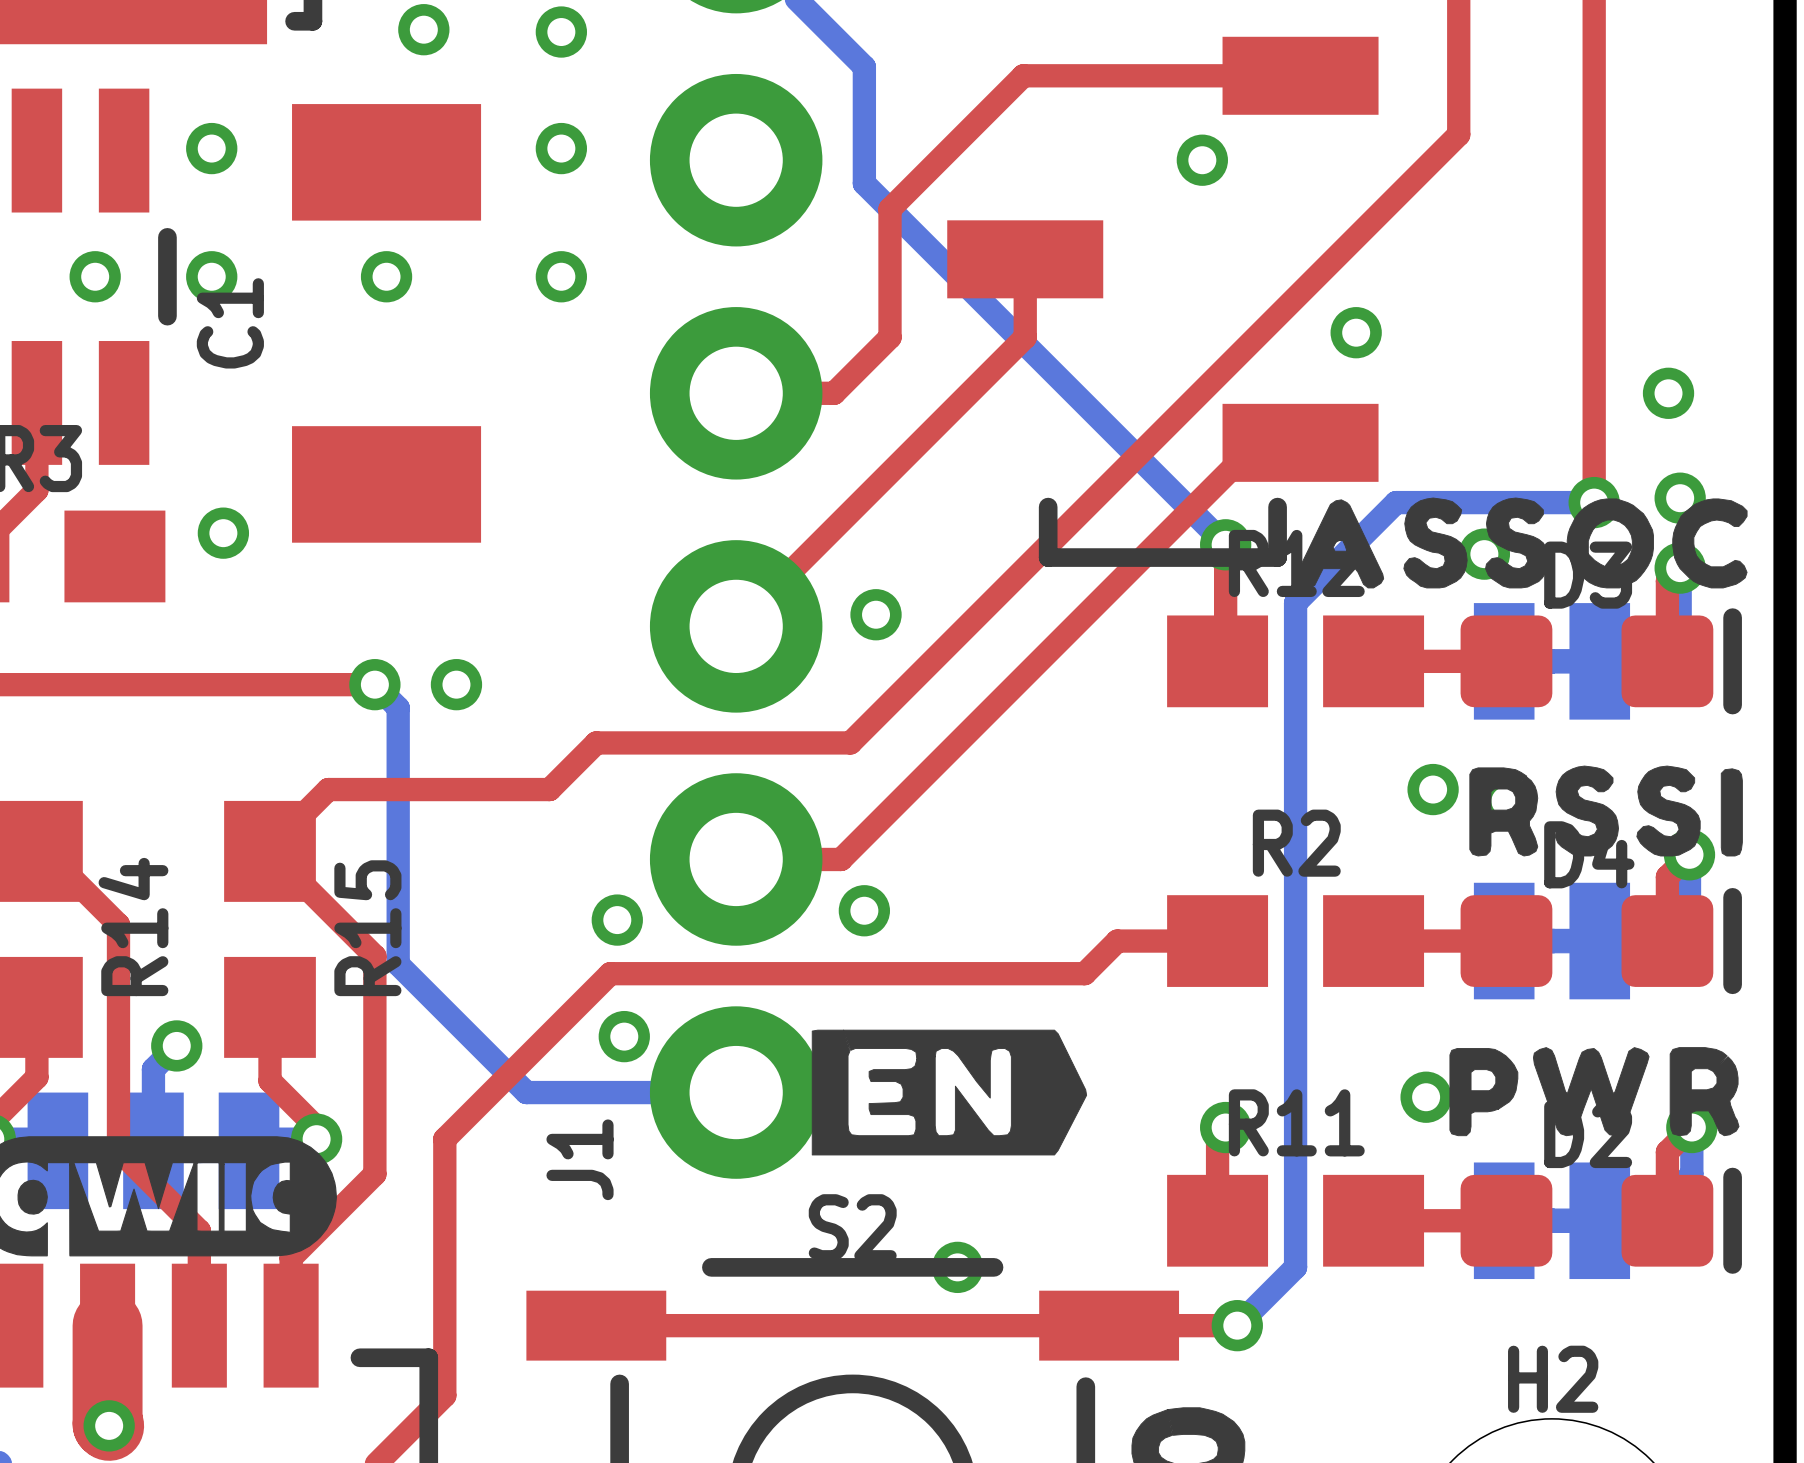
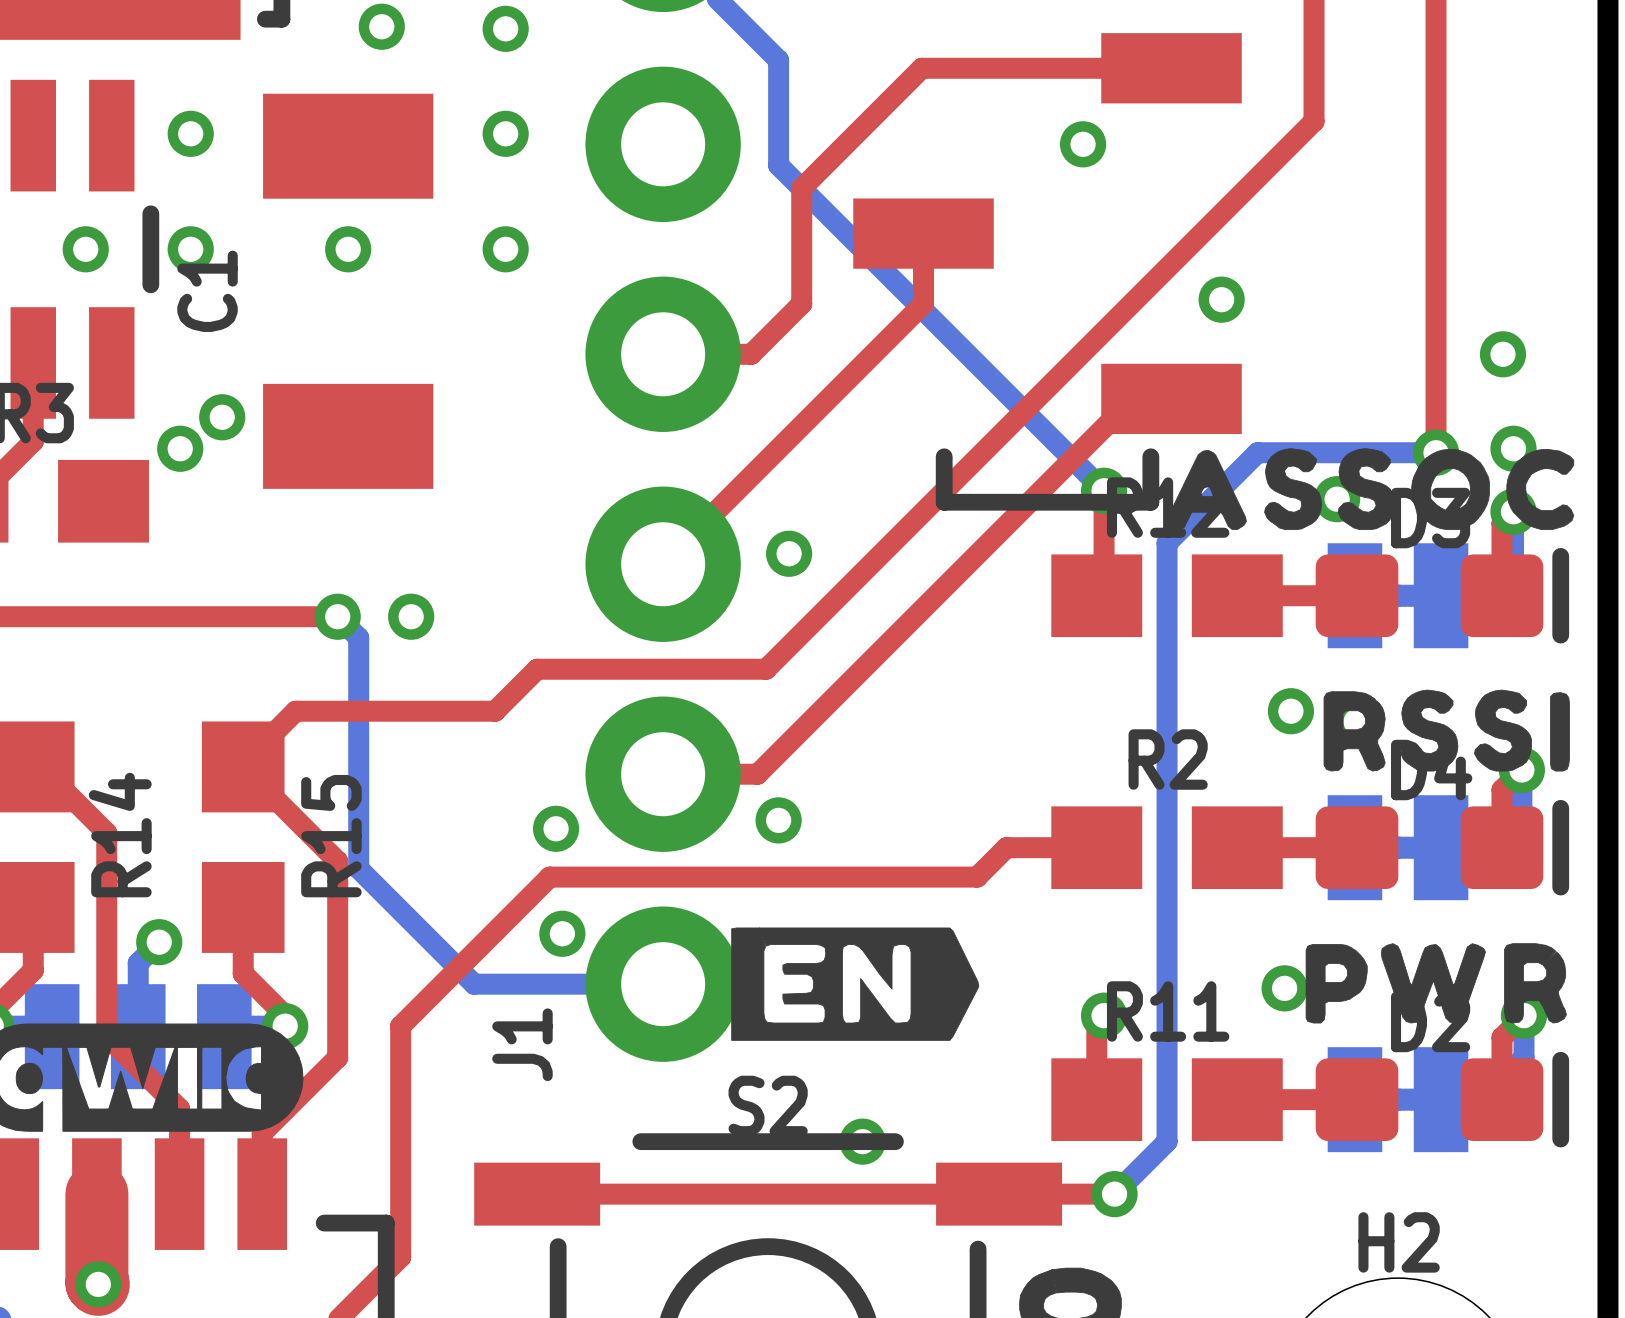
via: none -> (222, 417)
via position: (223, 533) -> (180, 448)

